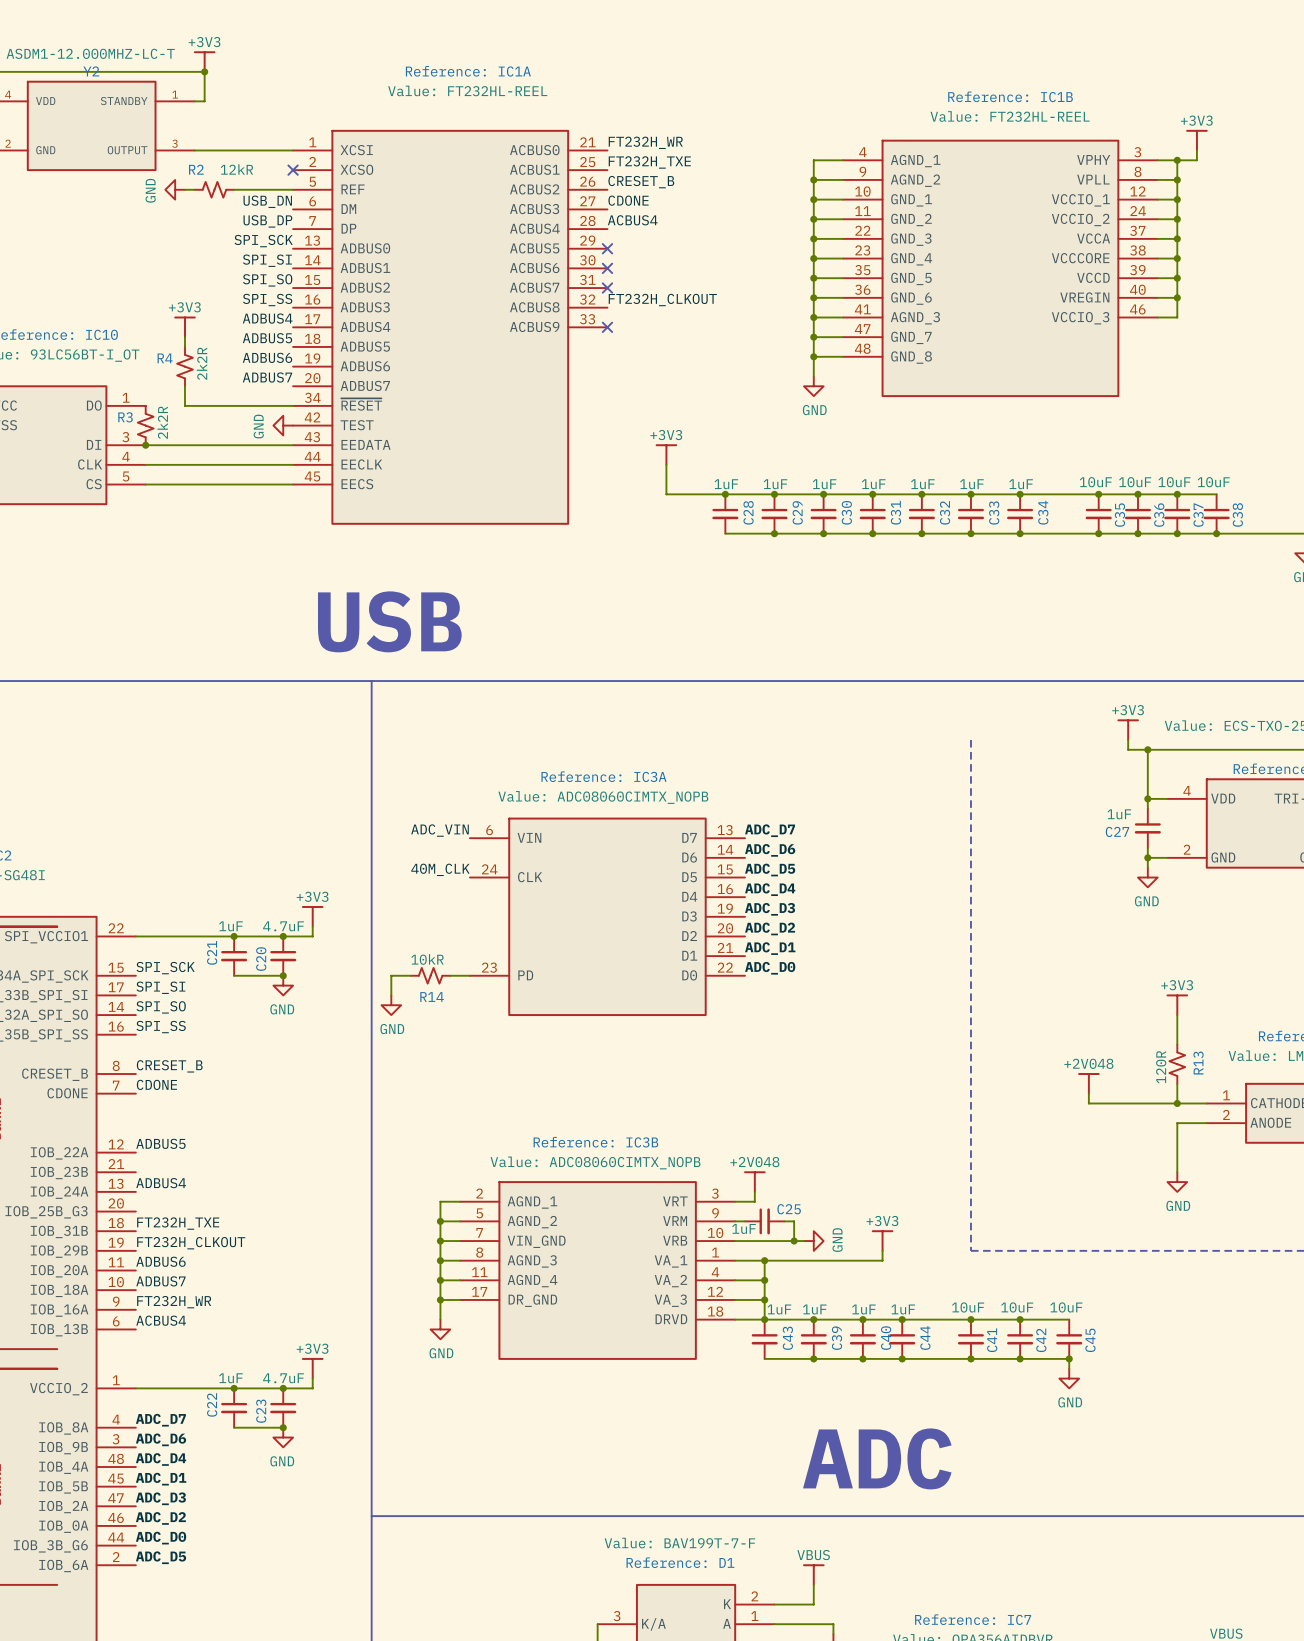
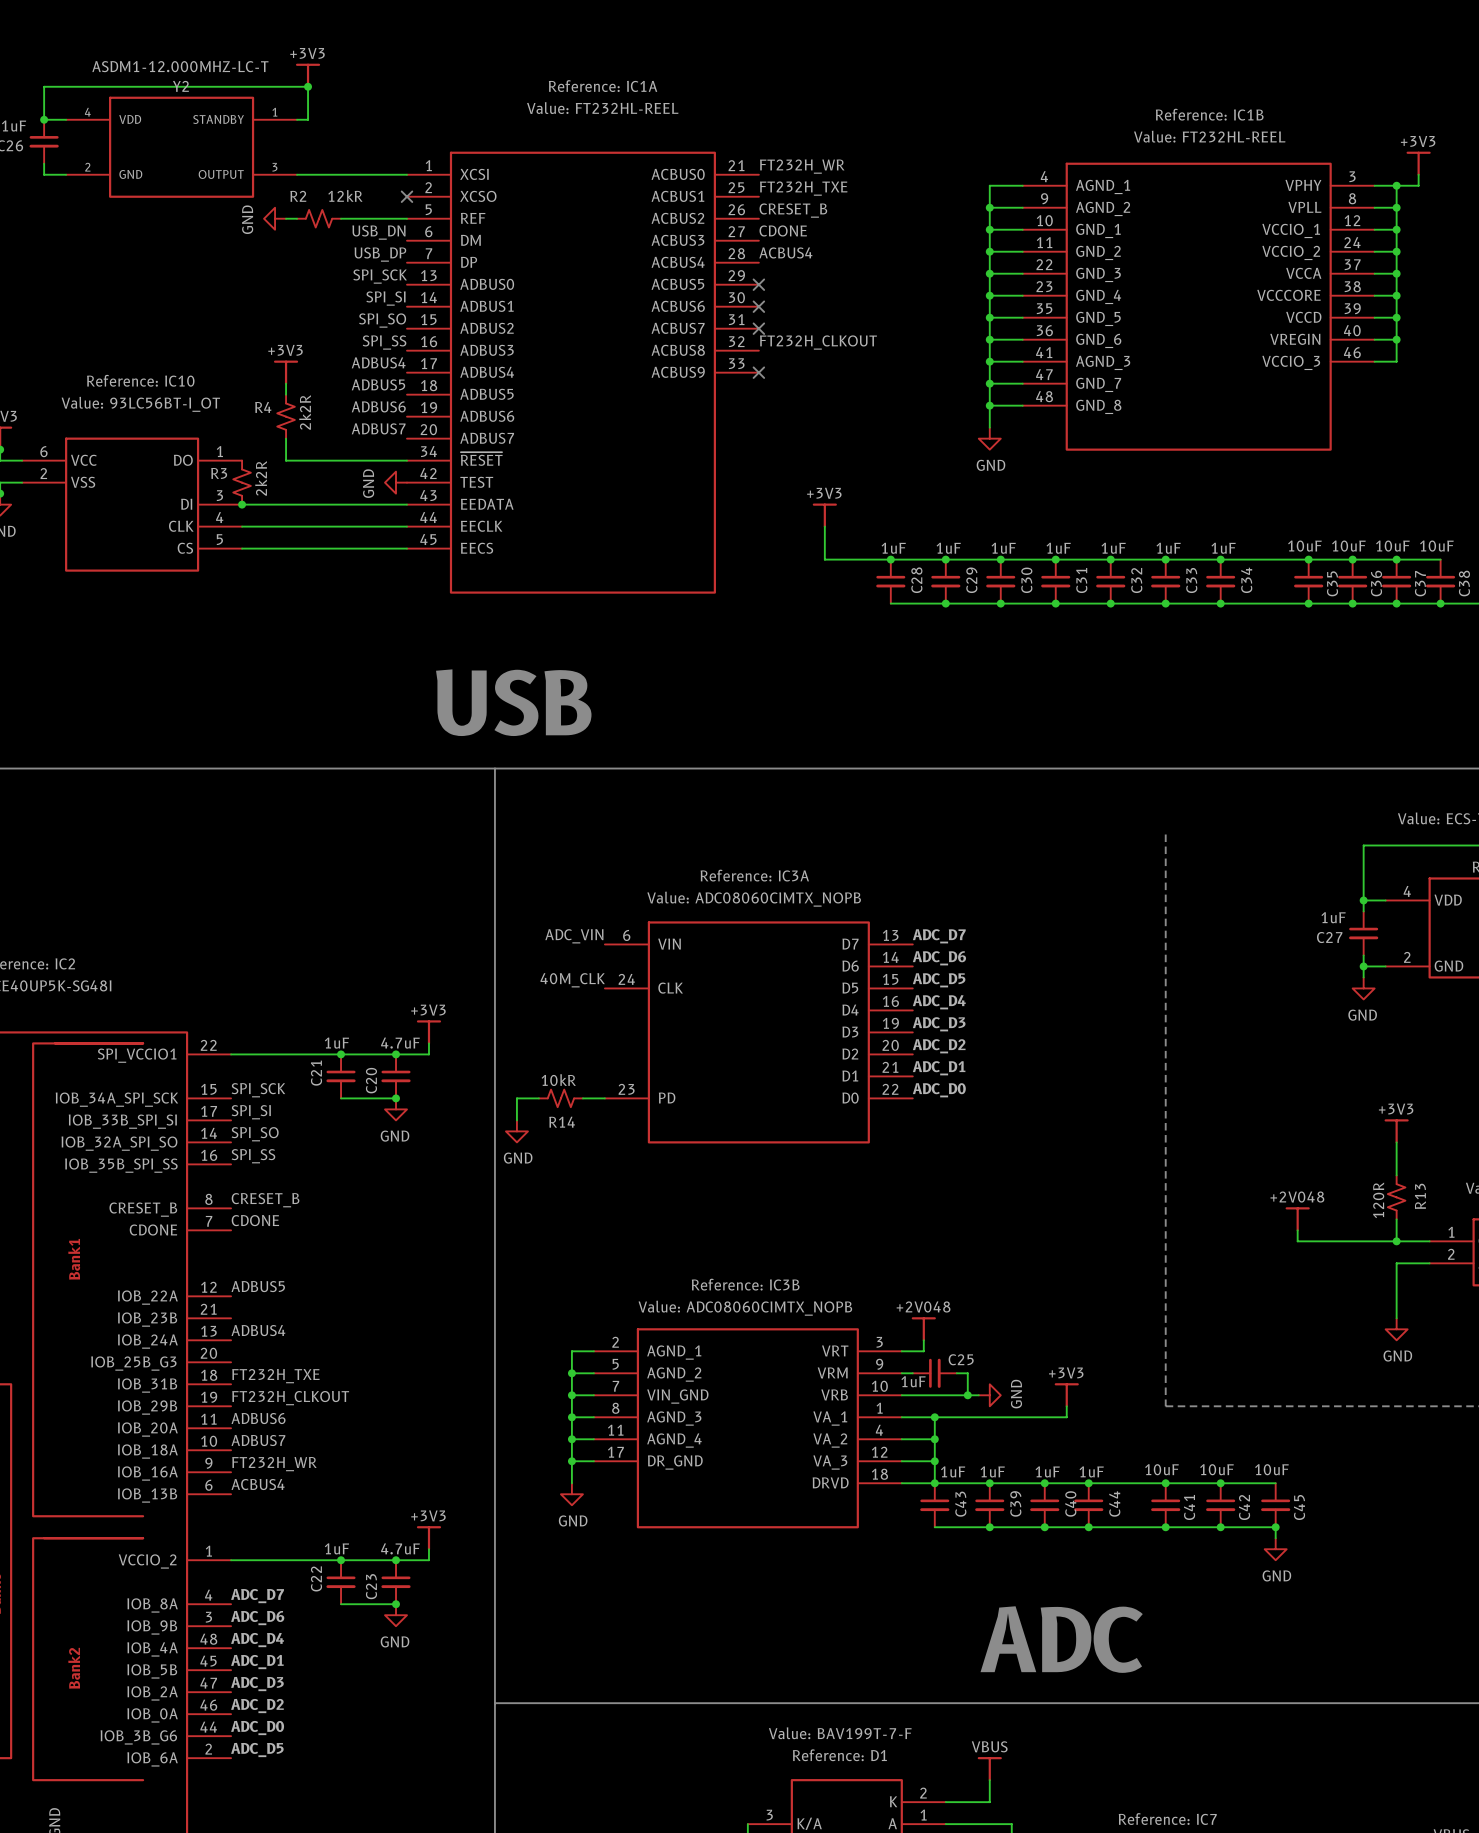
power symbol: +3V3 (1128, 730) -> none
wire: (1128, 739) (1128, 749) (1147, 749) -> none
junction: (1147, 749) -> none

